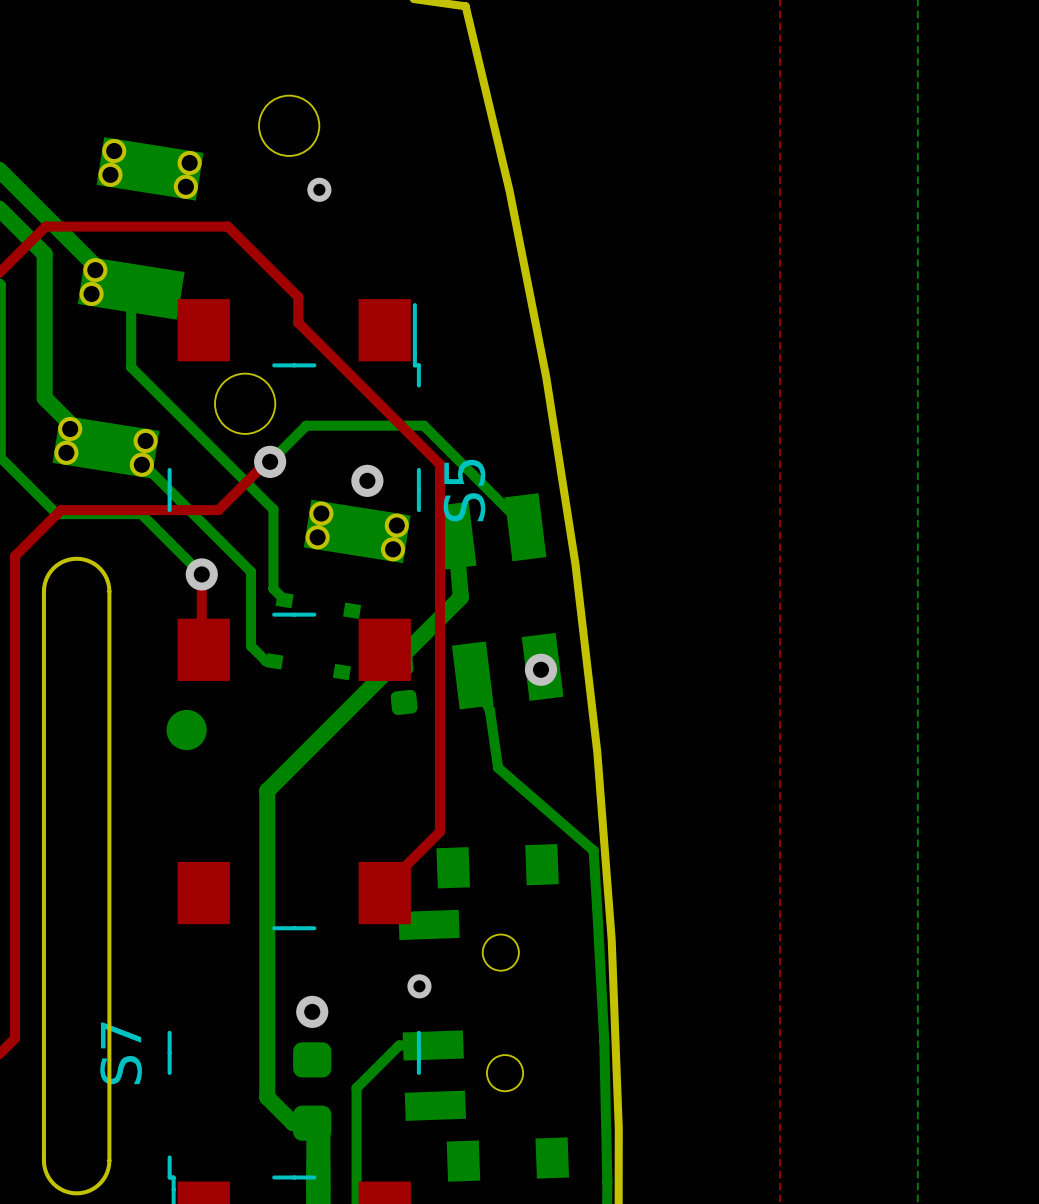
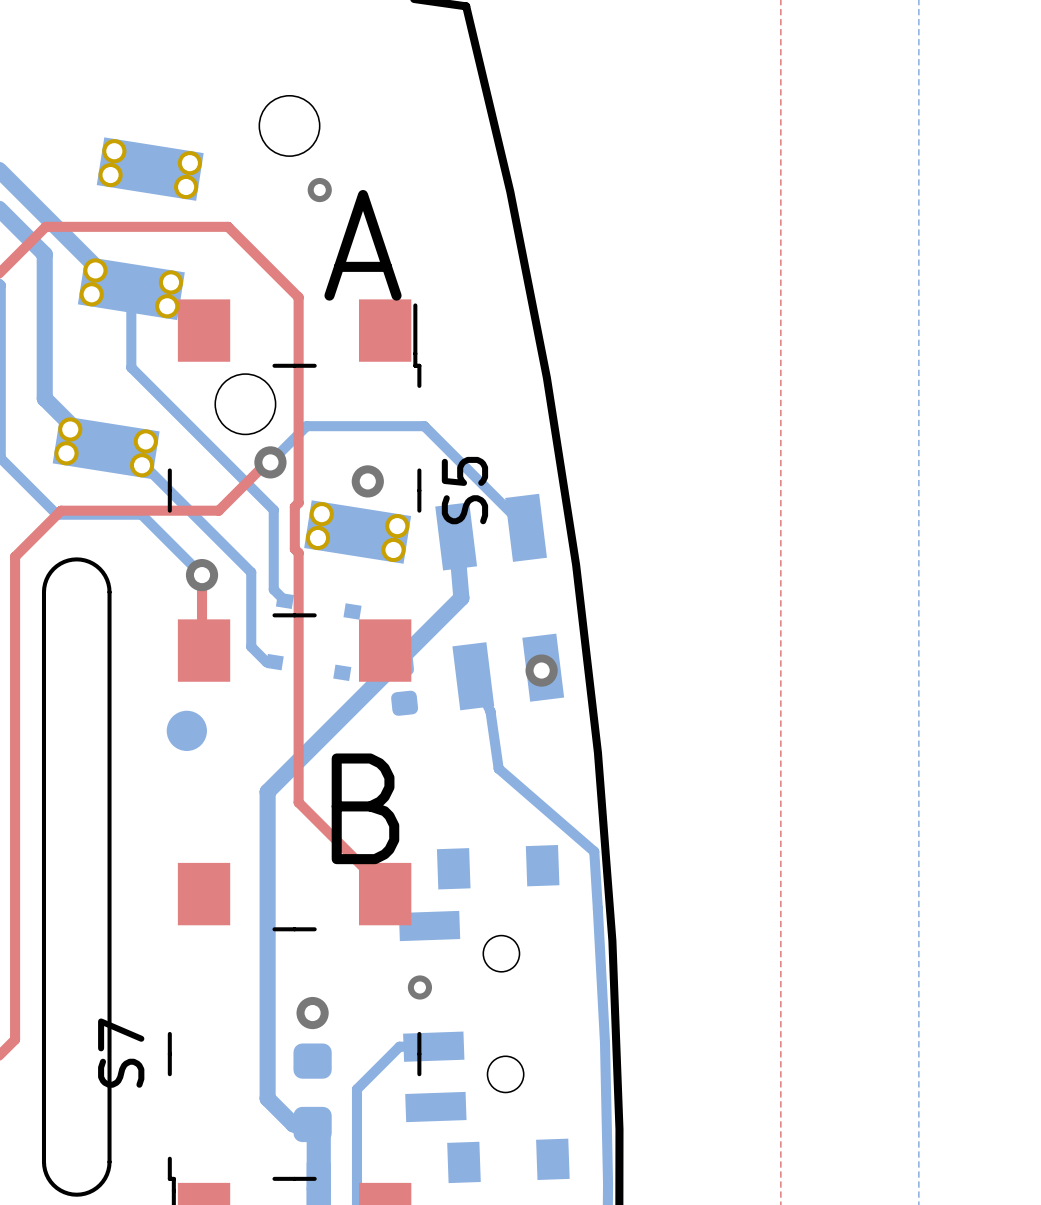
part footprint: [52, 95, 411, 564] -> [52, 95, 412, 564]
text: none -> A (363, 245)
top track: (298, 322) (440, 464) (440, 831) (384, 887) (384, 893) -> (298, 323) (298, 503) (294, 506) (294, 549) (298, 552) (298, 802) (385, 889)
text: none -> B (365, 808)

